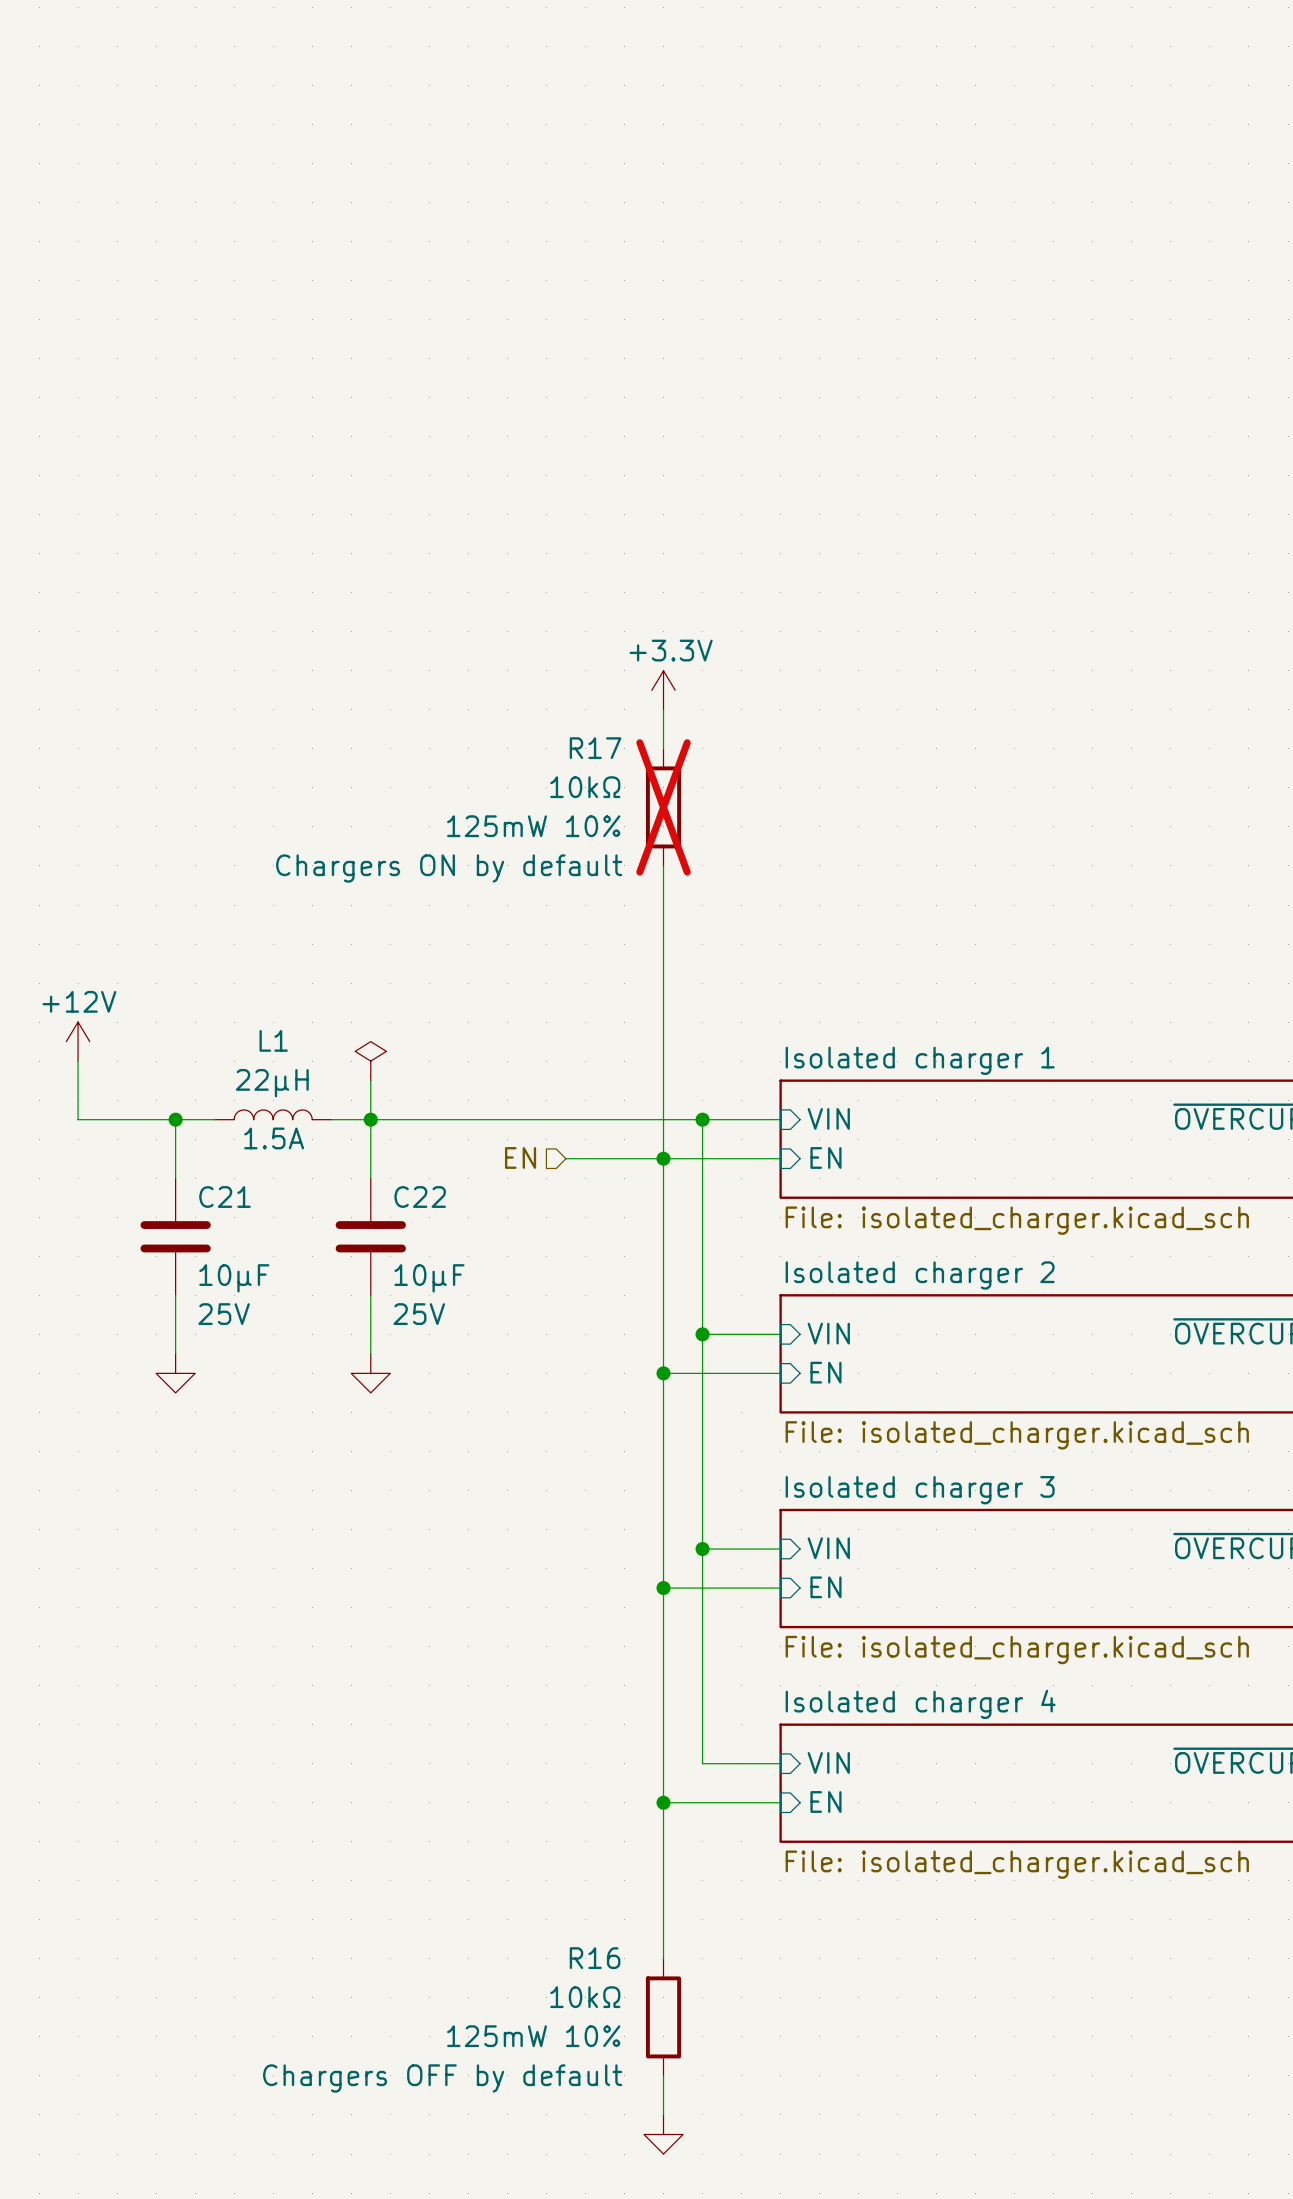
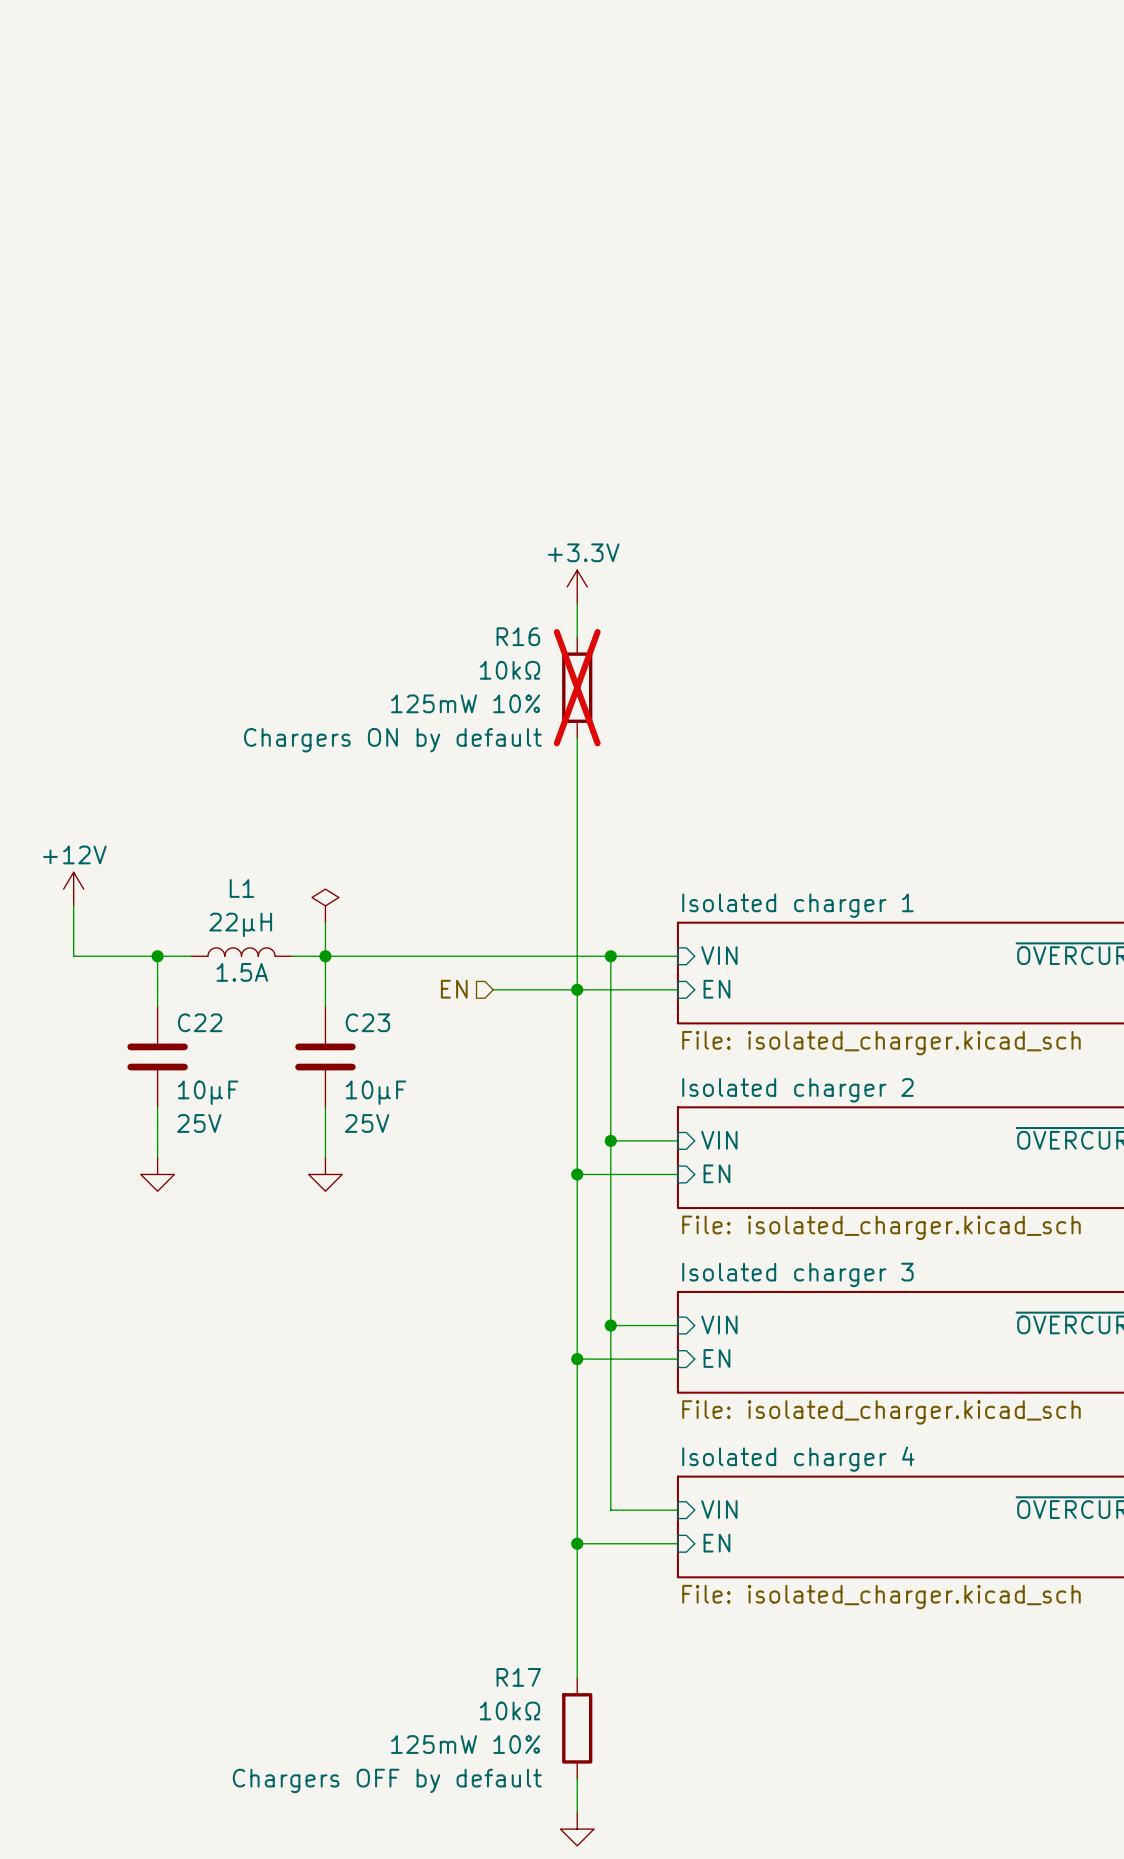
R17 name: R17 (595, 748) -> R16 (518, 636)
C21 name: C21 (225, 1197) -> C22 (200, 1022)
C22 name: C22 (420, 1197) -> C23 (367, 1022)
R16 name: R16 (595, 1958) -> R17 (518, 1677)

